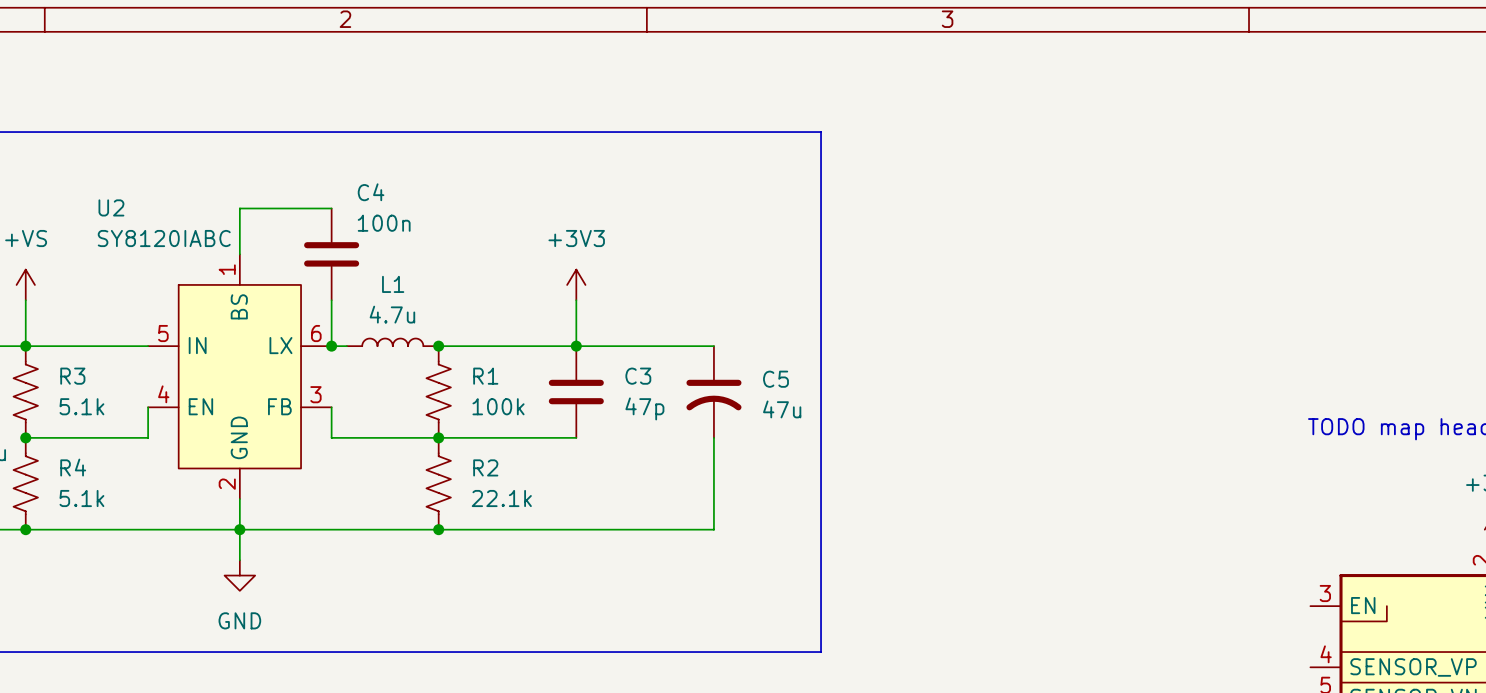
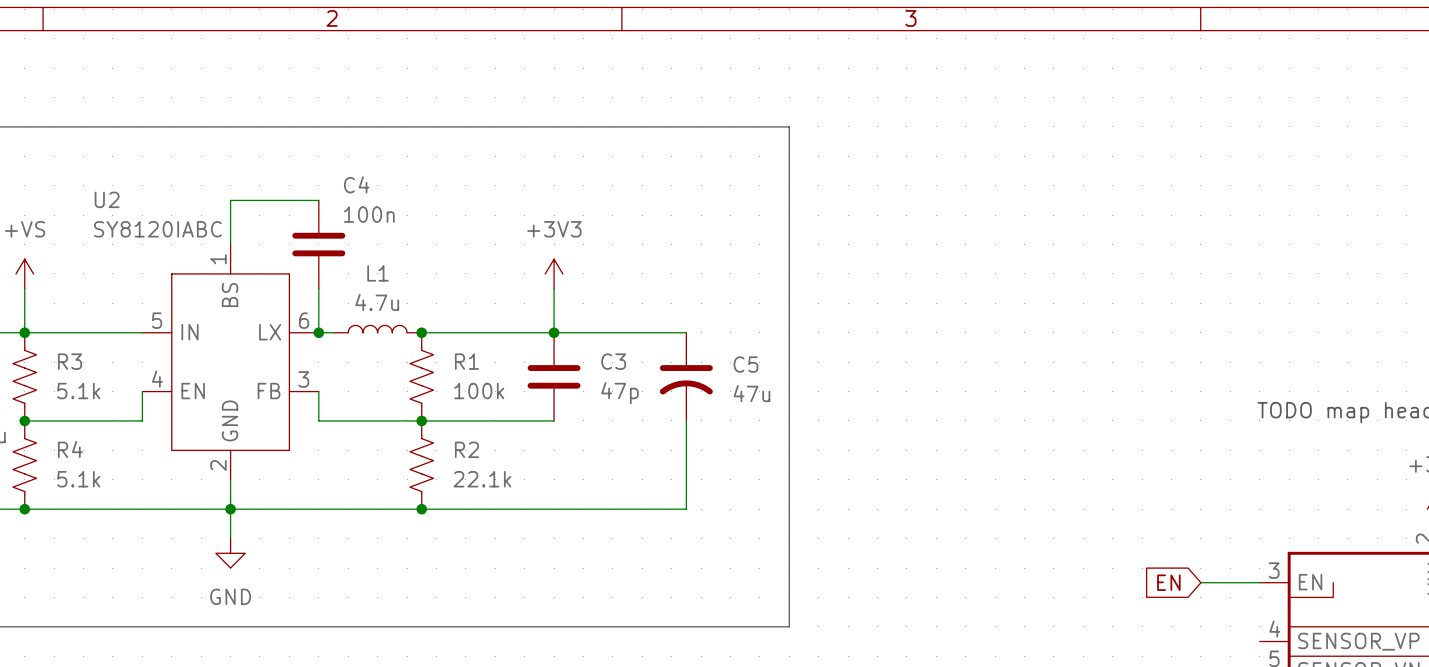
global label: none -> EN (1168, 582)
wire: none -> (1200, 582) (1259, 582)

